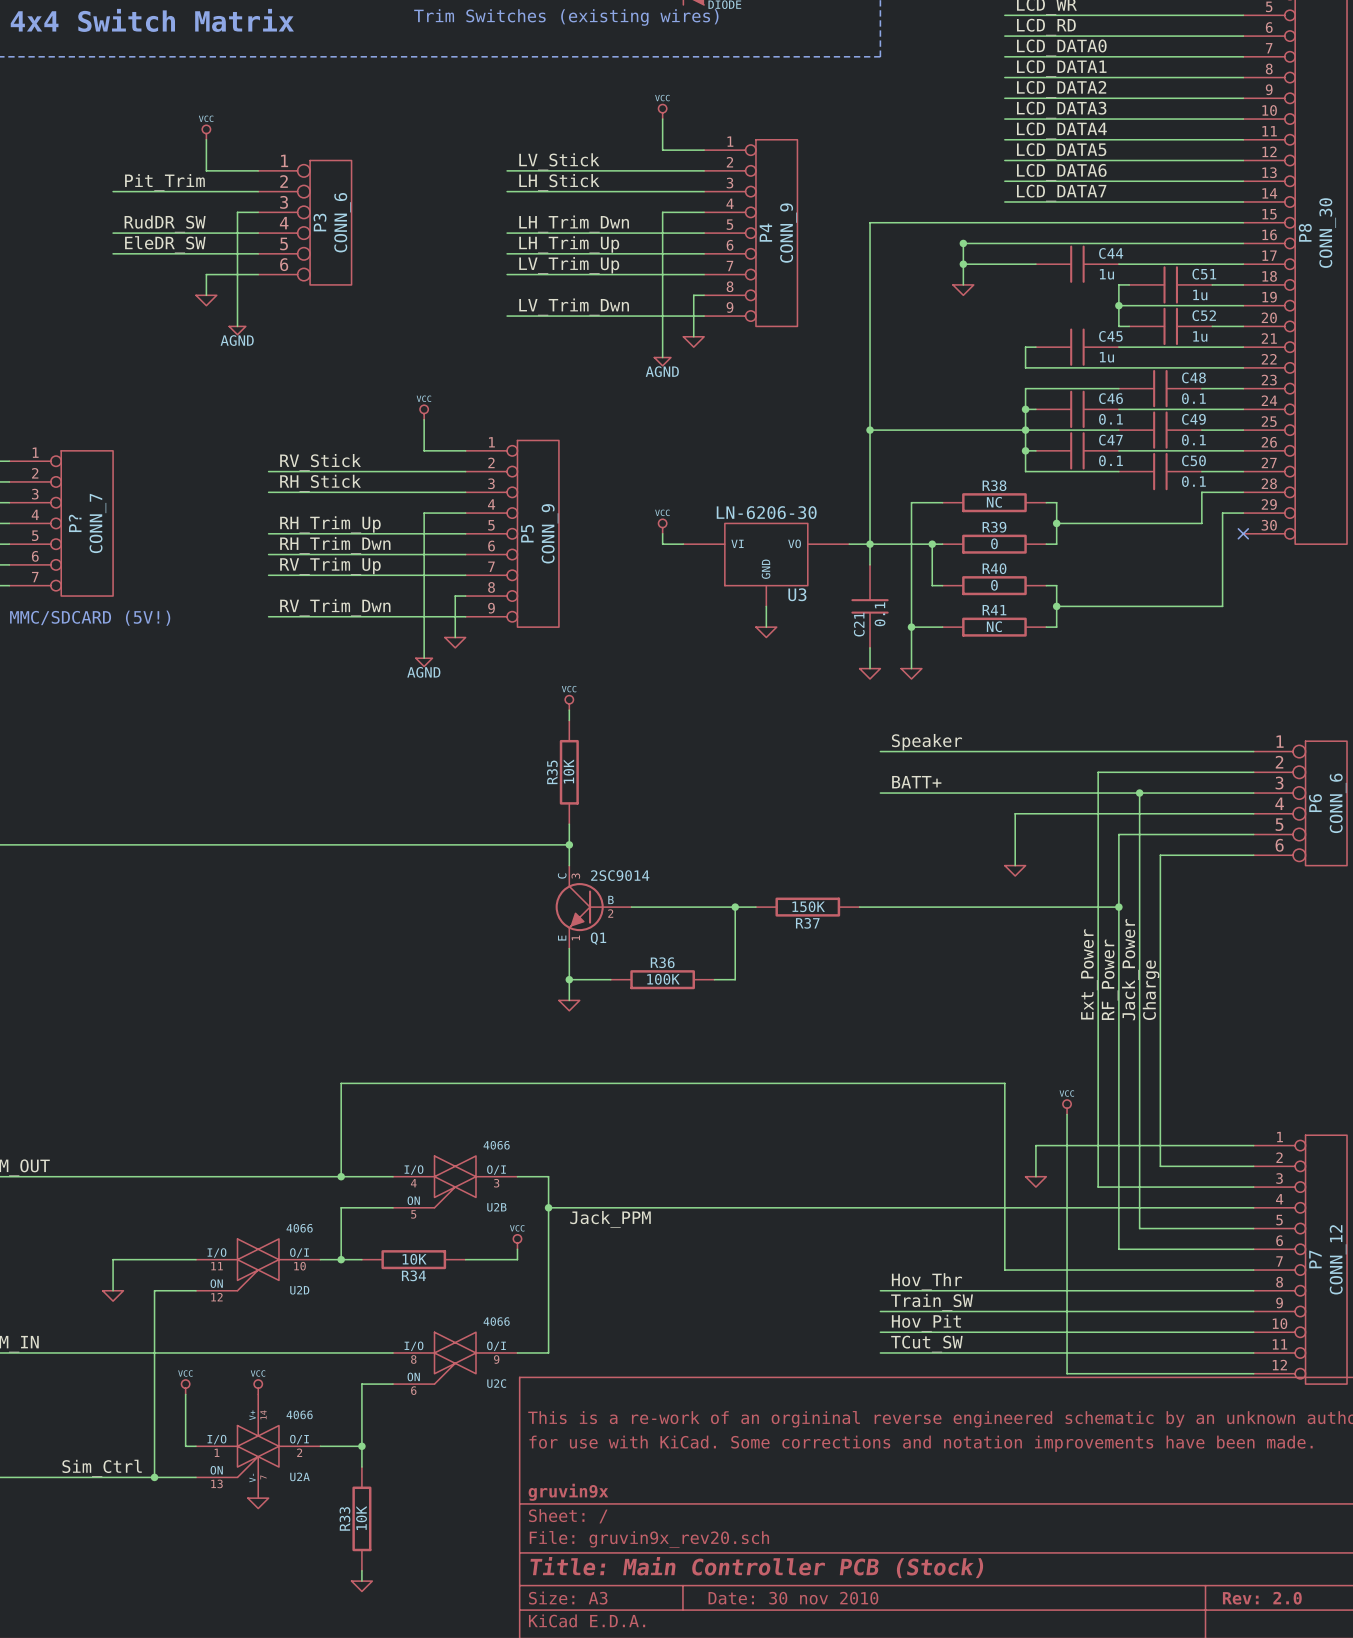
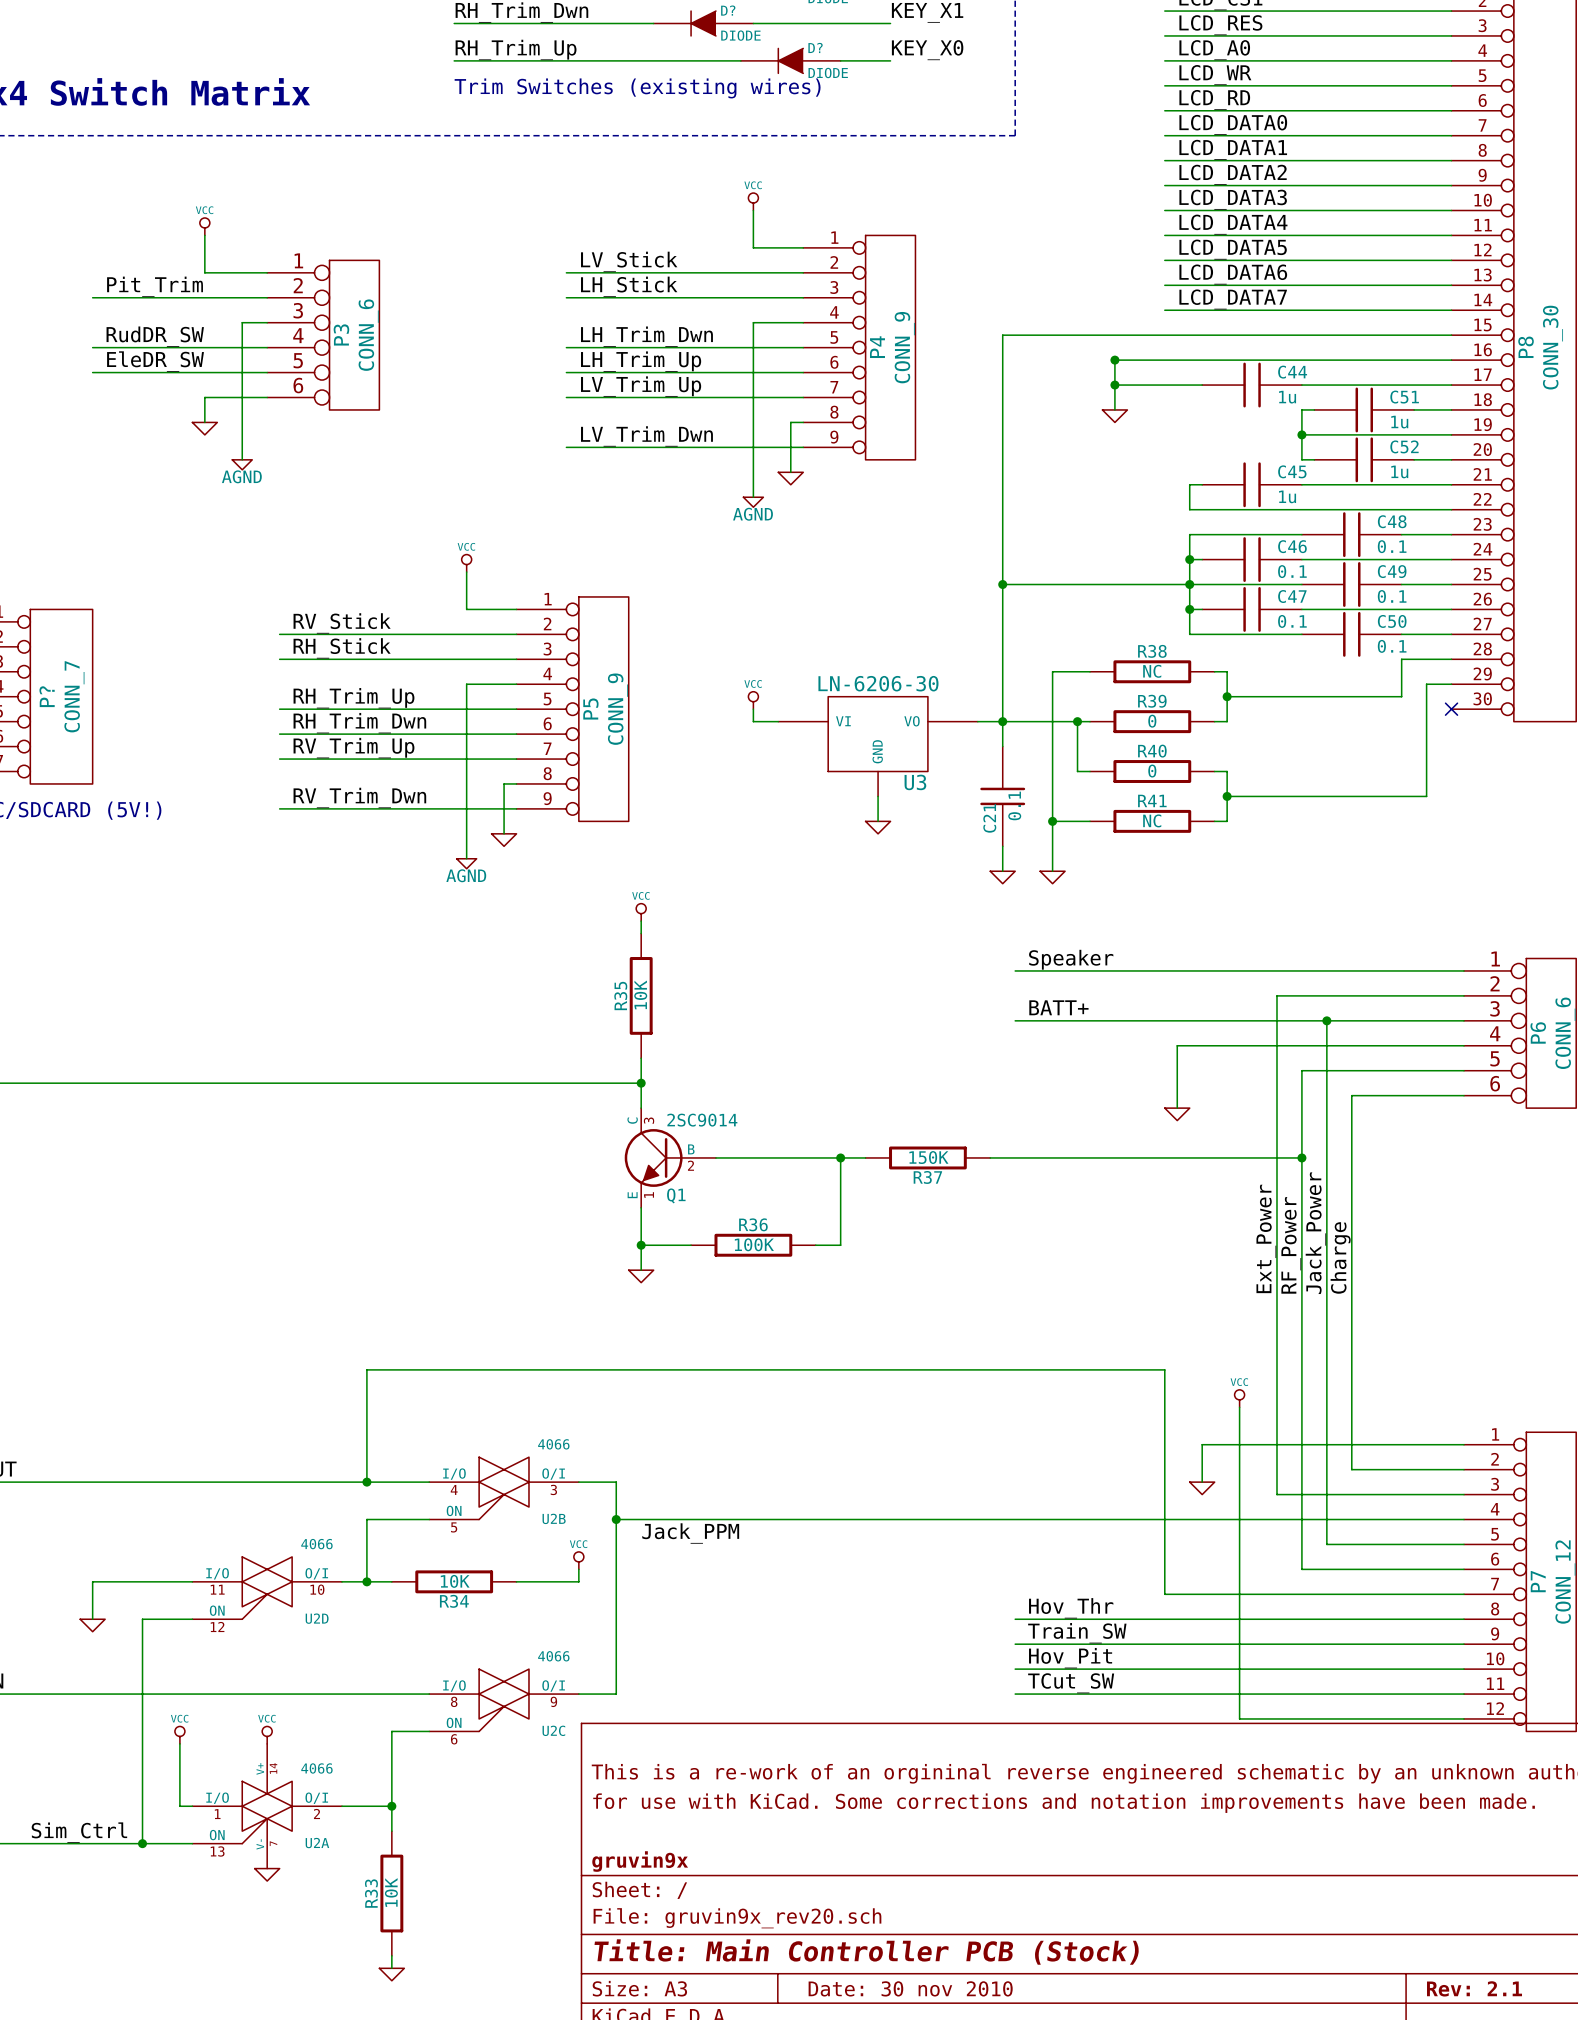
title block: Rev: 2.0 (1262, 1598) -> Rev: 2.1 (1474, 1988)

